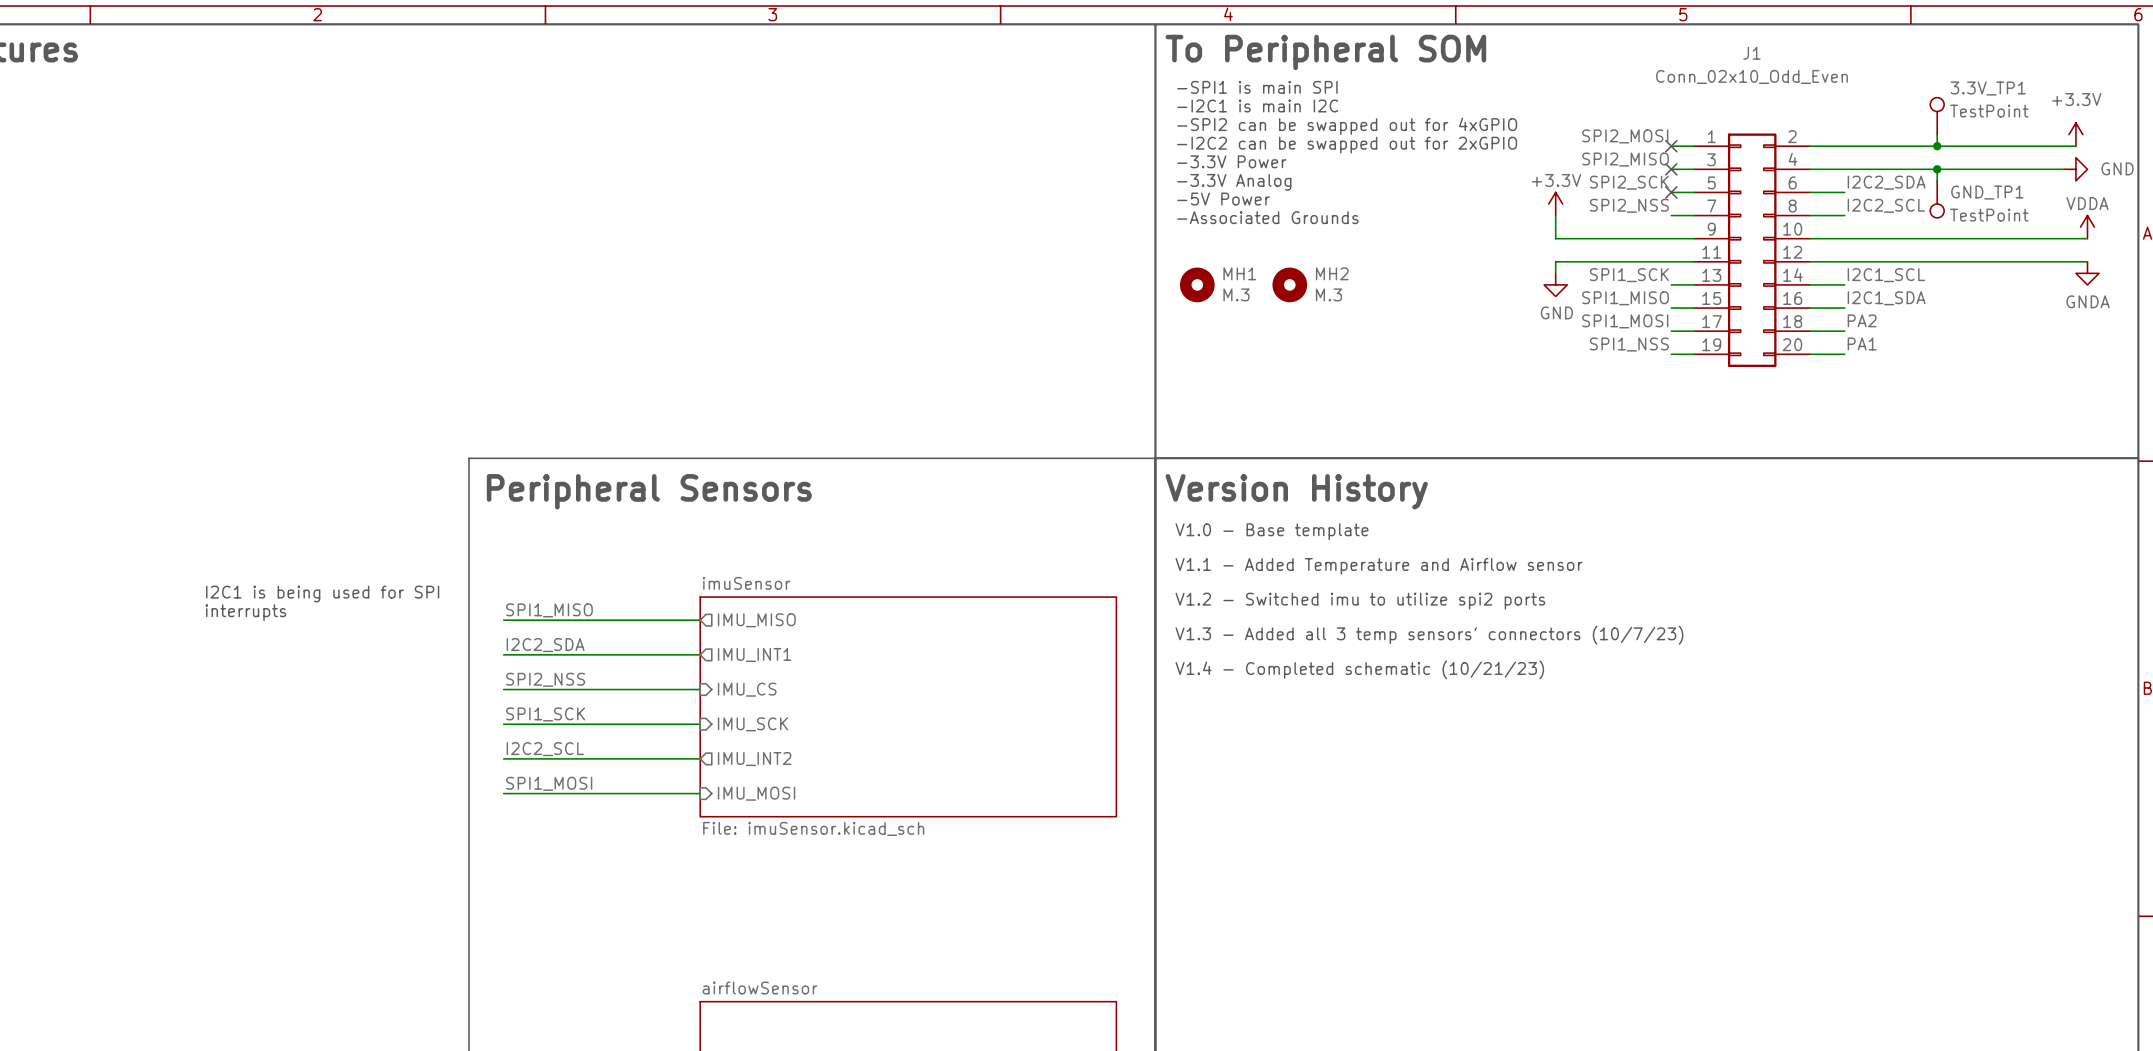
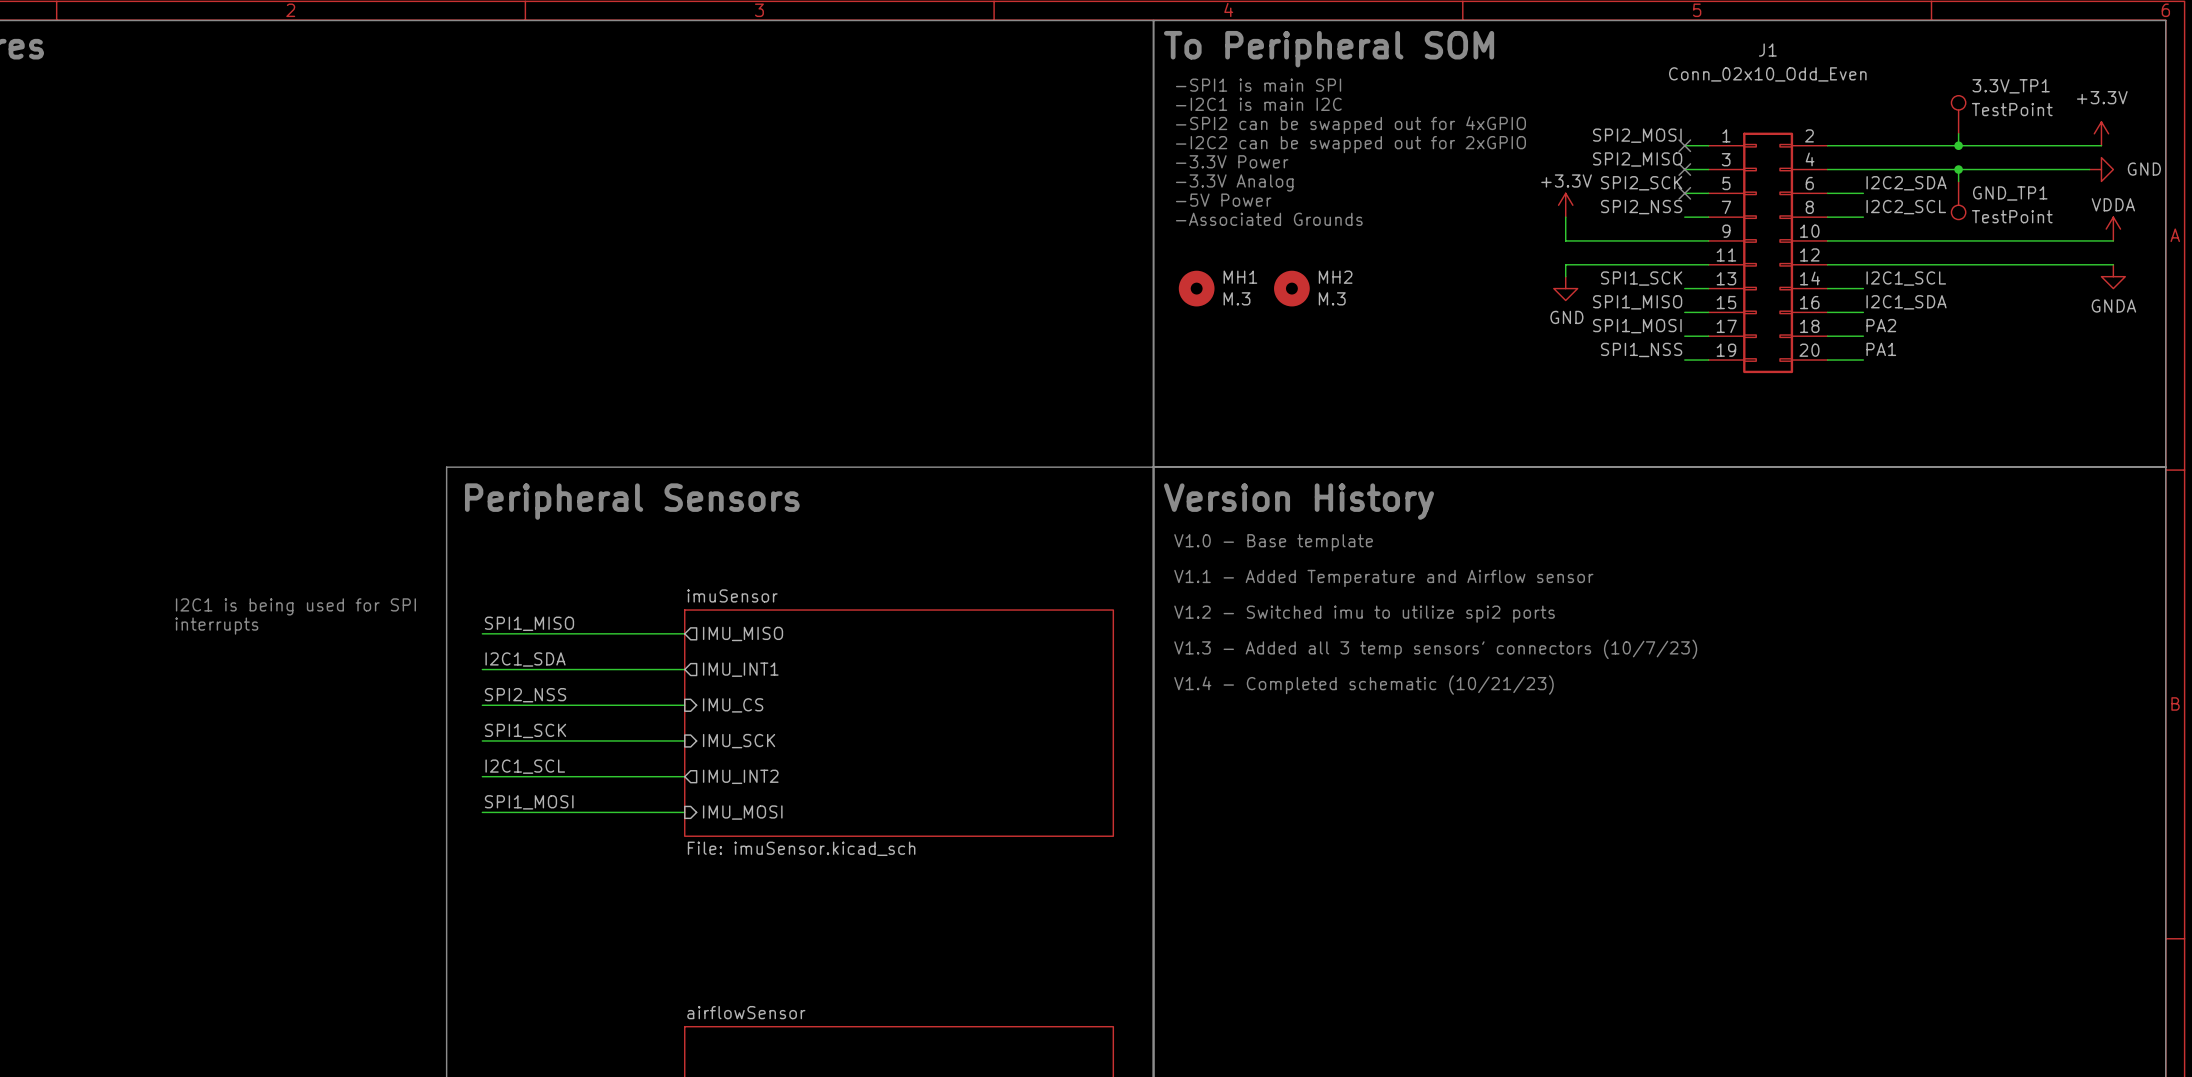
label: I2C2_SDA (545, 645) -> I2C1_SDA (525, 659)
label: I2C2_SCL (545, 749) -> I2C1_SCL (525, 766)

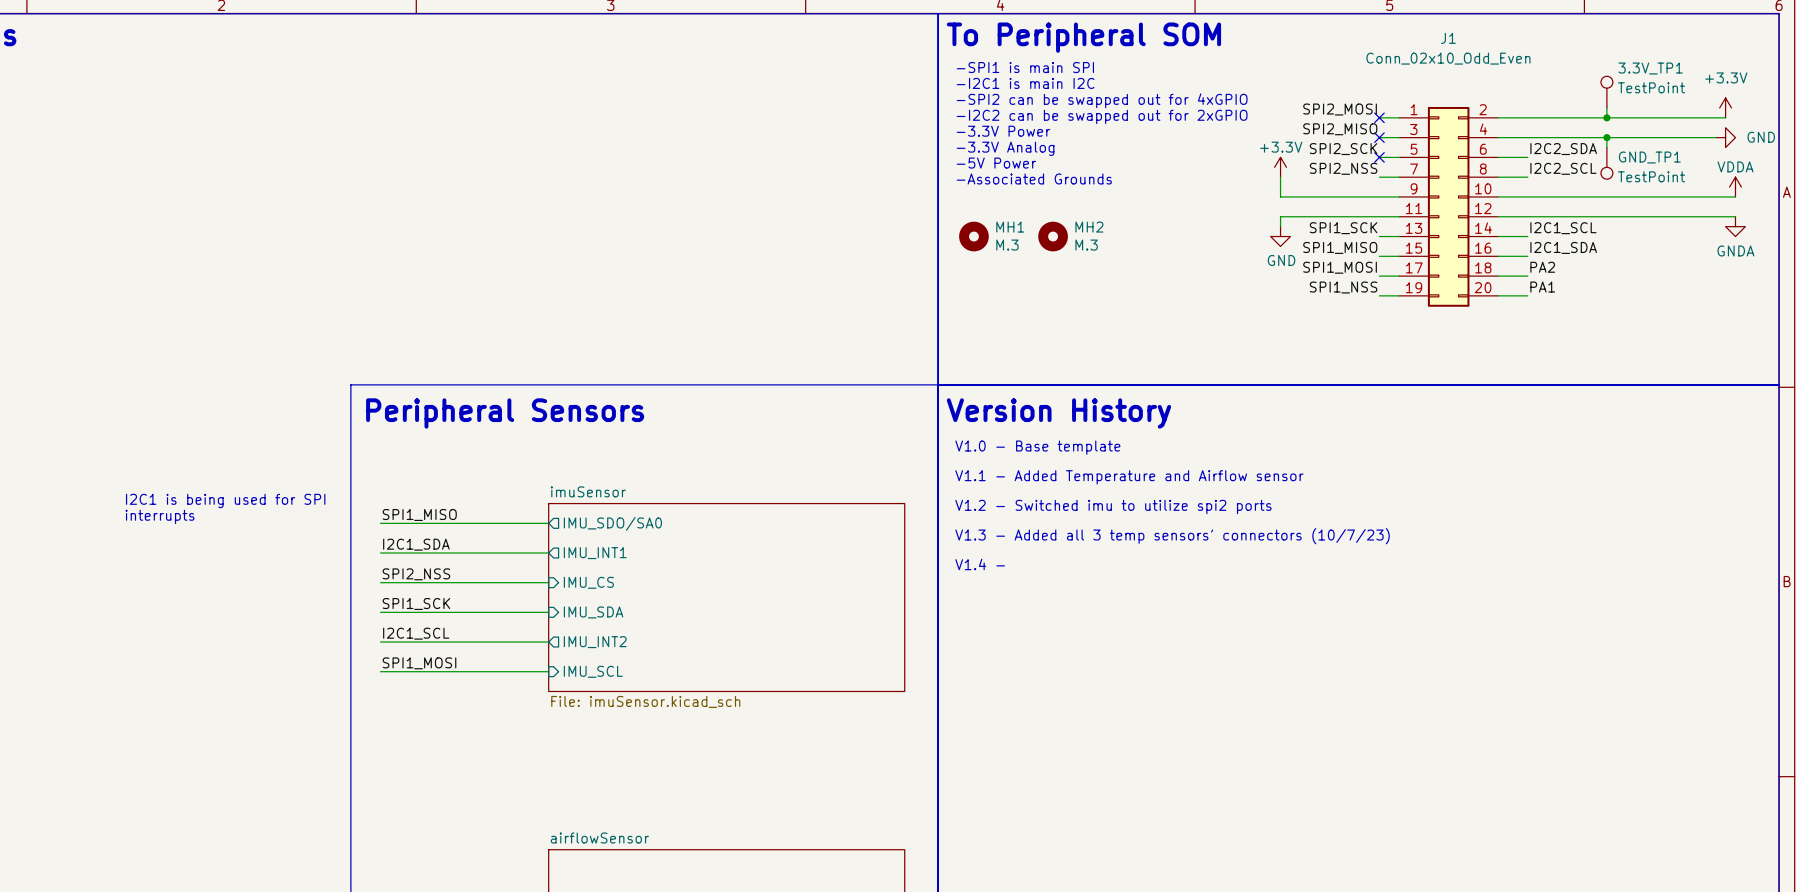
sheet pin: IMU_MISO (743, 633) -> IMU_SDO/SA0 (612, 523)
text: V1.4 - Completed schematic (10/21/23) (1363, 685) -> V1.4 - (980, 564)
sheet pin: IMU_SCK (739, 741) -> IMU_SDA (593, 612)
sheet pin: IMU_MOSI (742, 812) -> IMU_SCL (593, 671)

